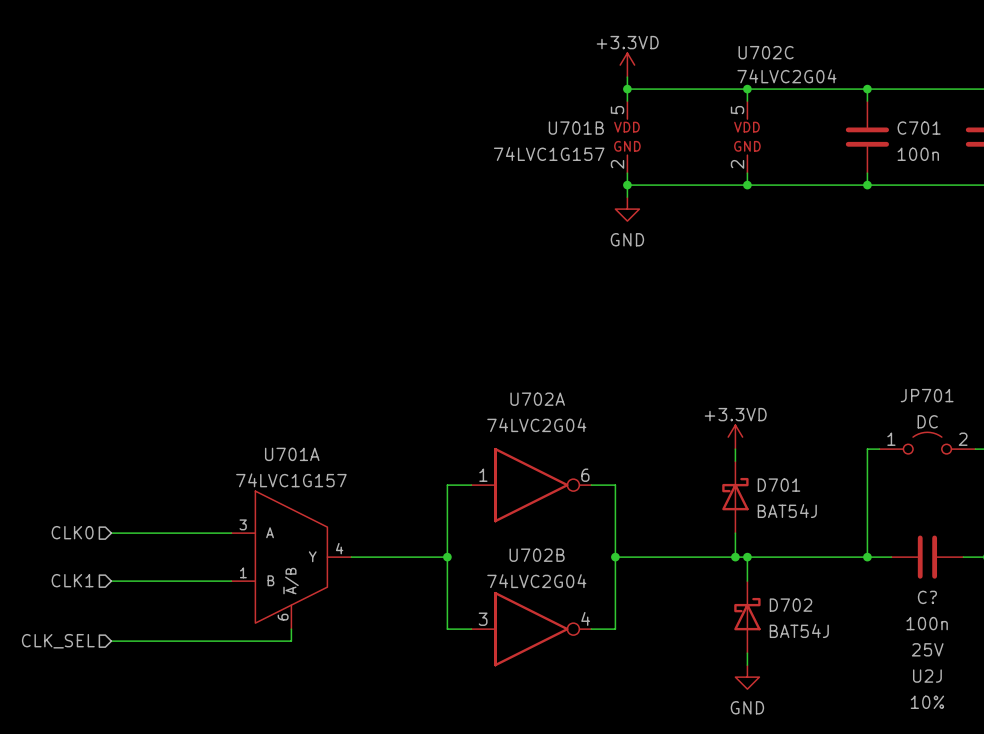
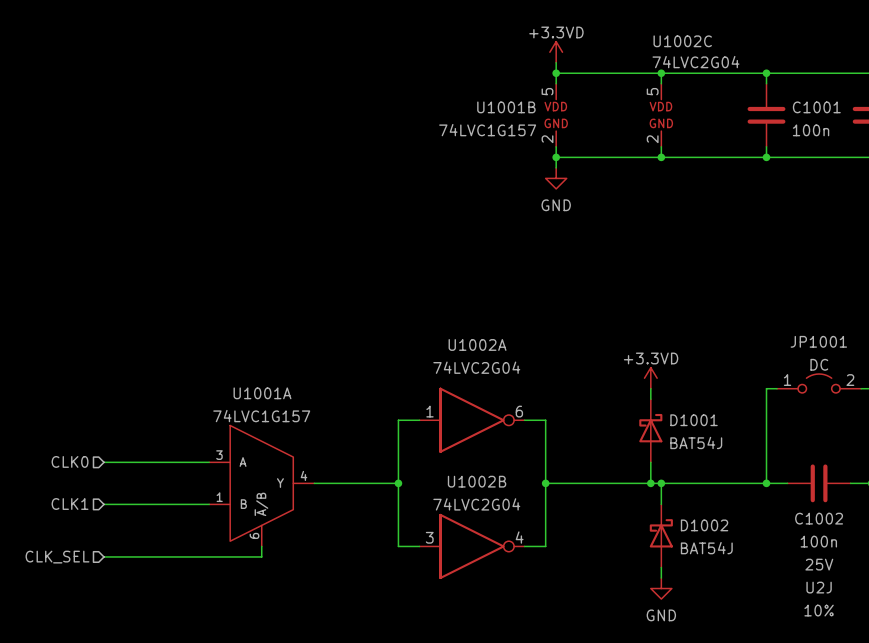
U702C name: U702C (766, 52) -> U1002C (682, 41)
U701B name: U701B (576, 128) -> U1001B (506, 107)
C701 name: C701 (919, 128) -> C1001 (816, 107)
JP701 name: JP701 (927, 395) -> JP1001 (818, 341)
U702A name: U702A (537, 399) -> U1002A (477, 344)
U701A name: U701A (292, 454) -> U1001A (262, 393)
D701 name: D701 (778, 485) -> D1001 (694, 420)
U702B name: U702B (537, 555) -> U1002B (477, 481)
C? name: C? (927, 597) -> C1002 (819, 518)
D702 name: D702 (790, 605) -> D1002 (704, 525)

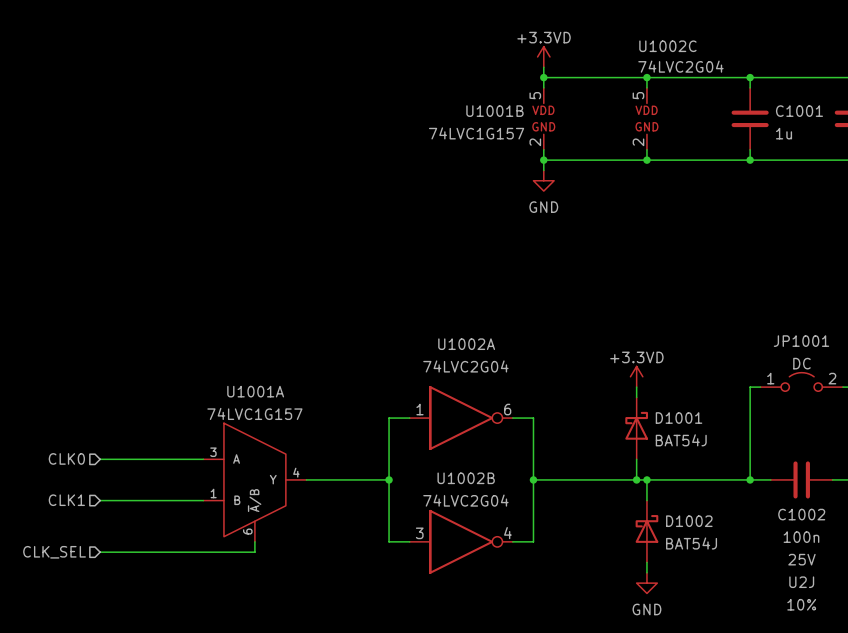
C1001 value: 100n (811, 130) -> 1u (784, 133)

